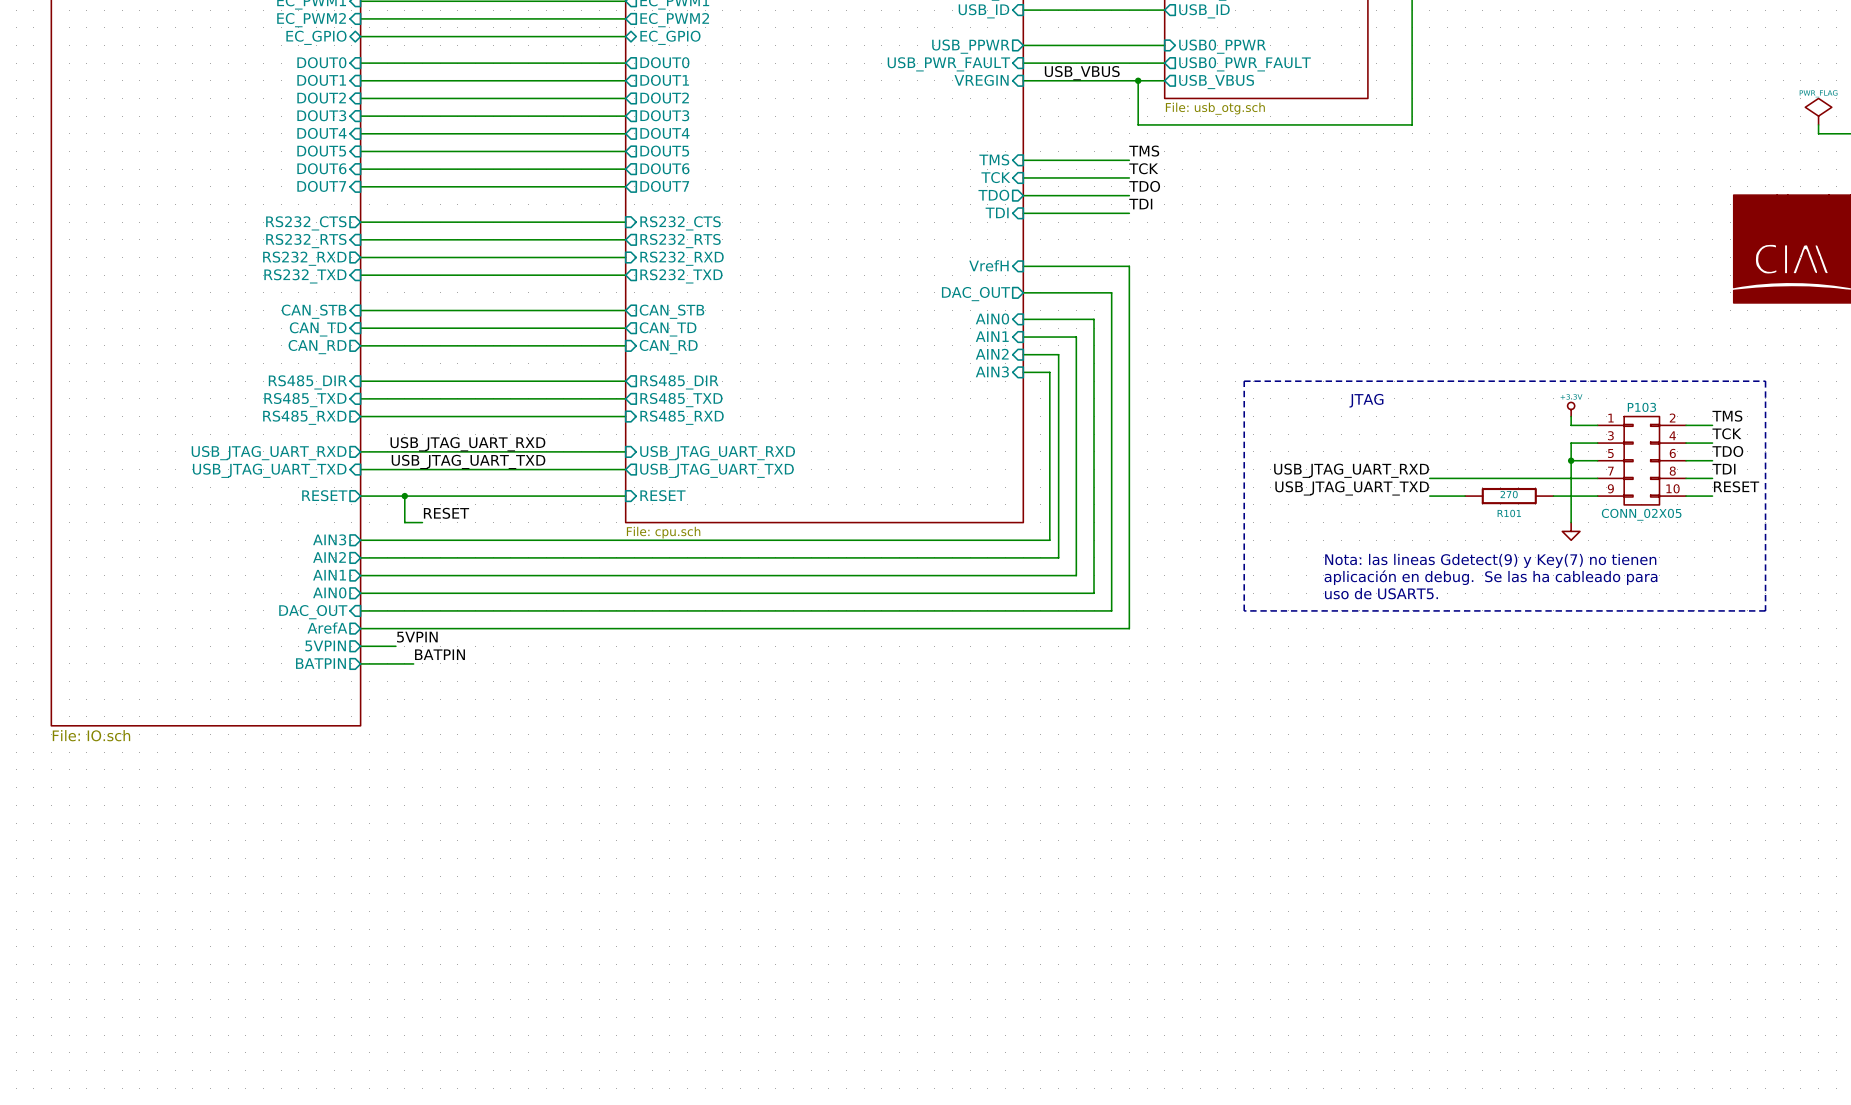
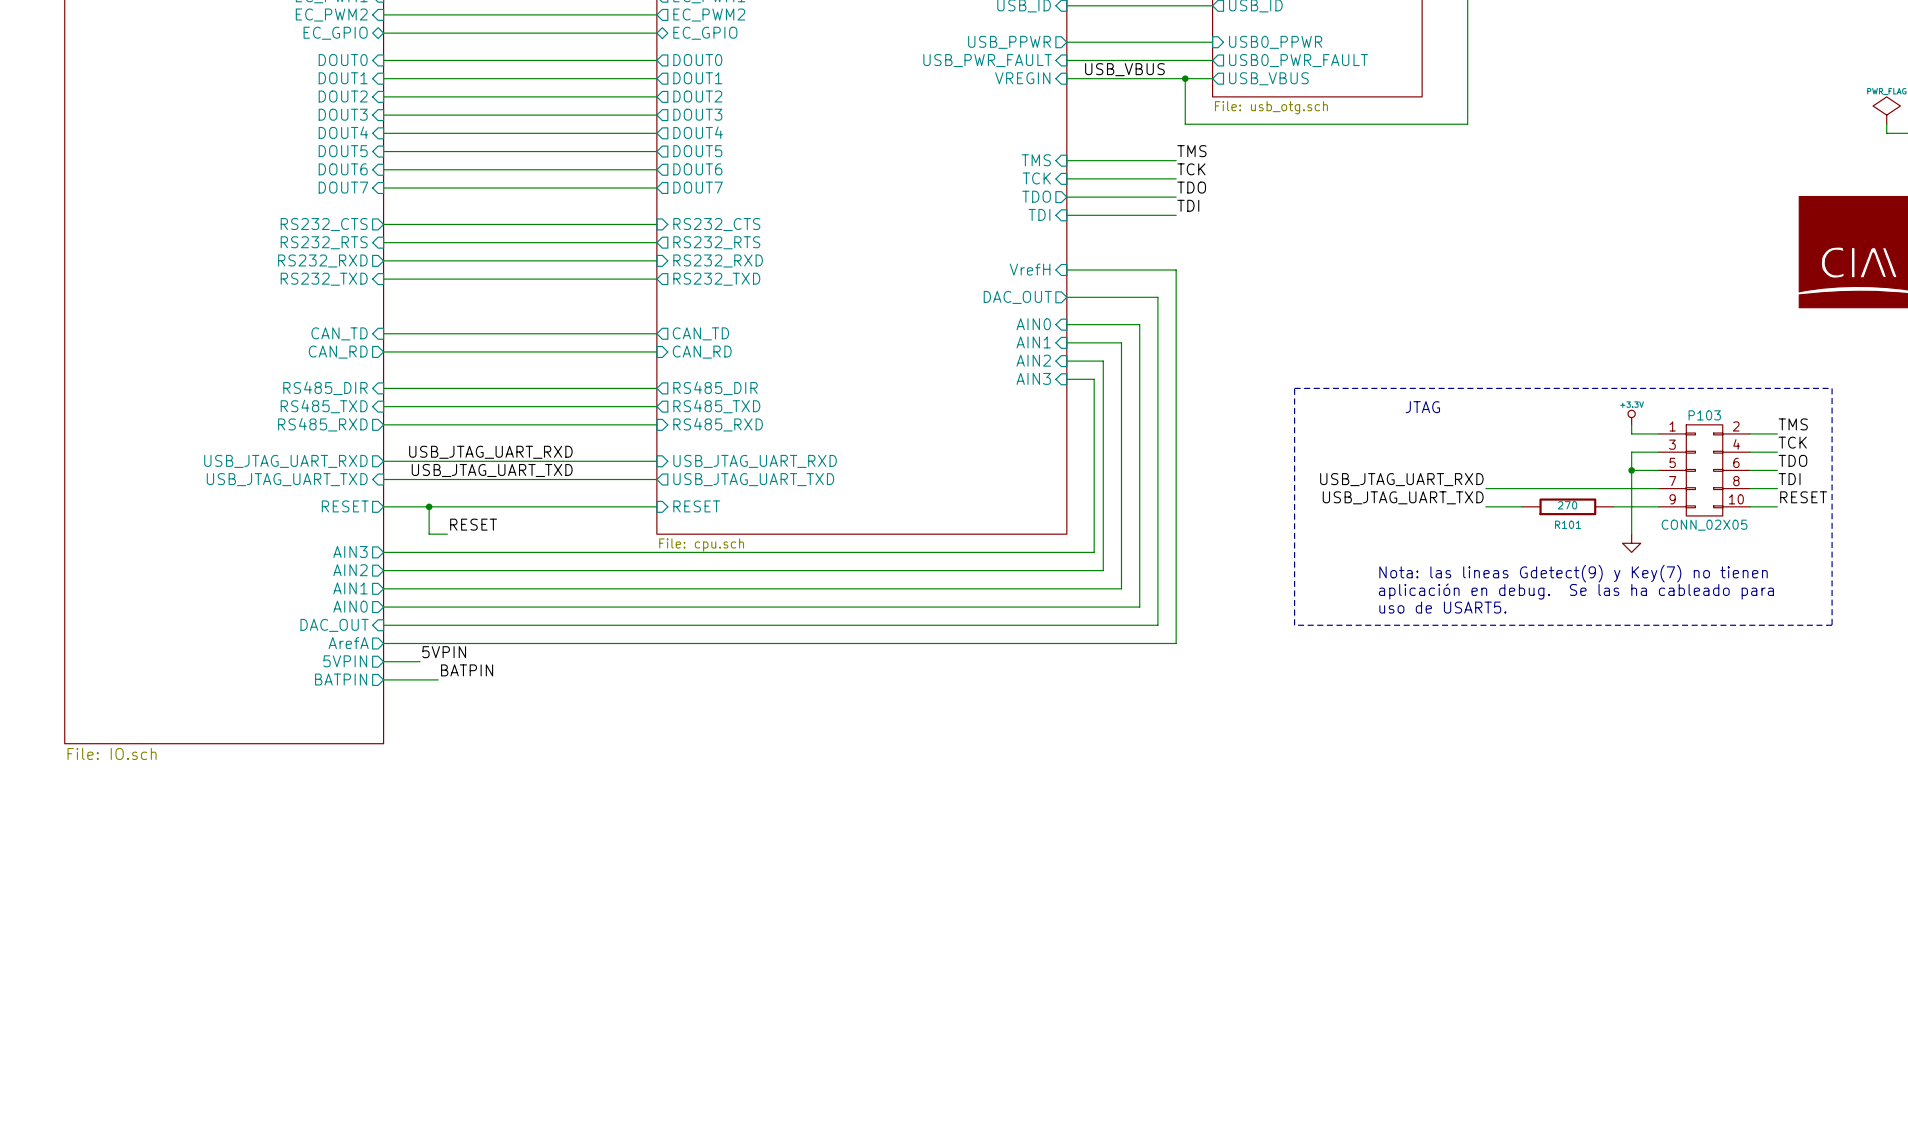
wire: (360, 310) (625, 310) -> none
sheet pin: CAN_STB (314, 311) -> none
sheet pin: CAN_STB (672, 311) -> none

